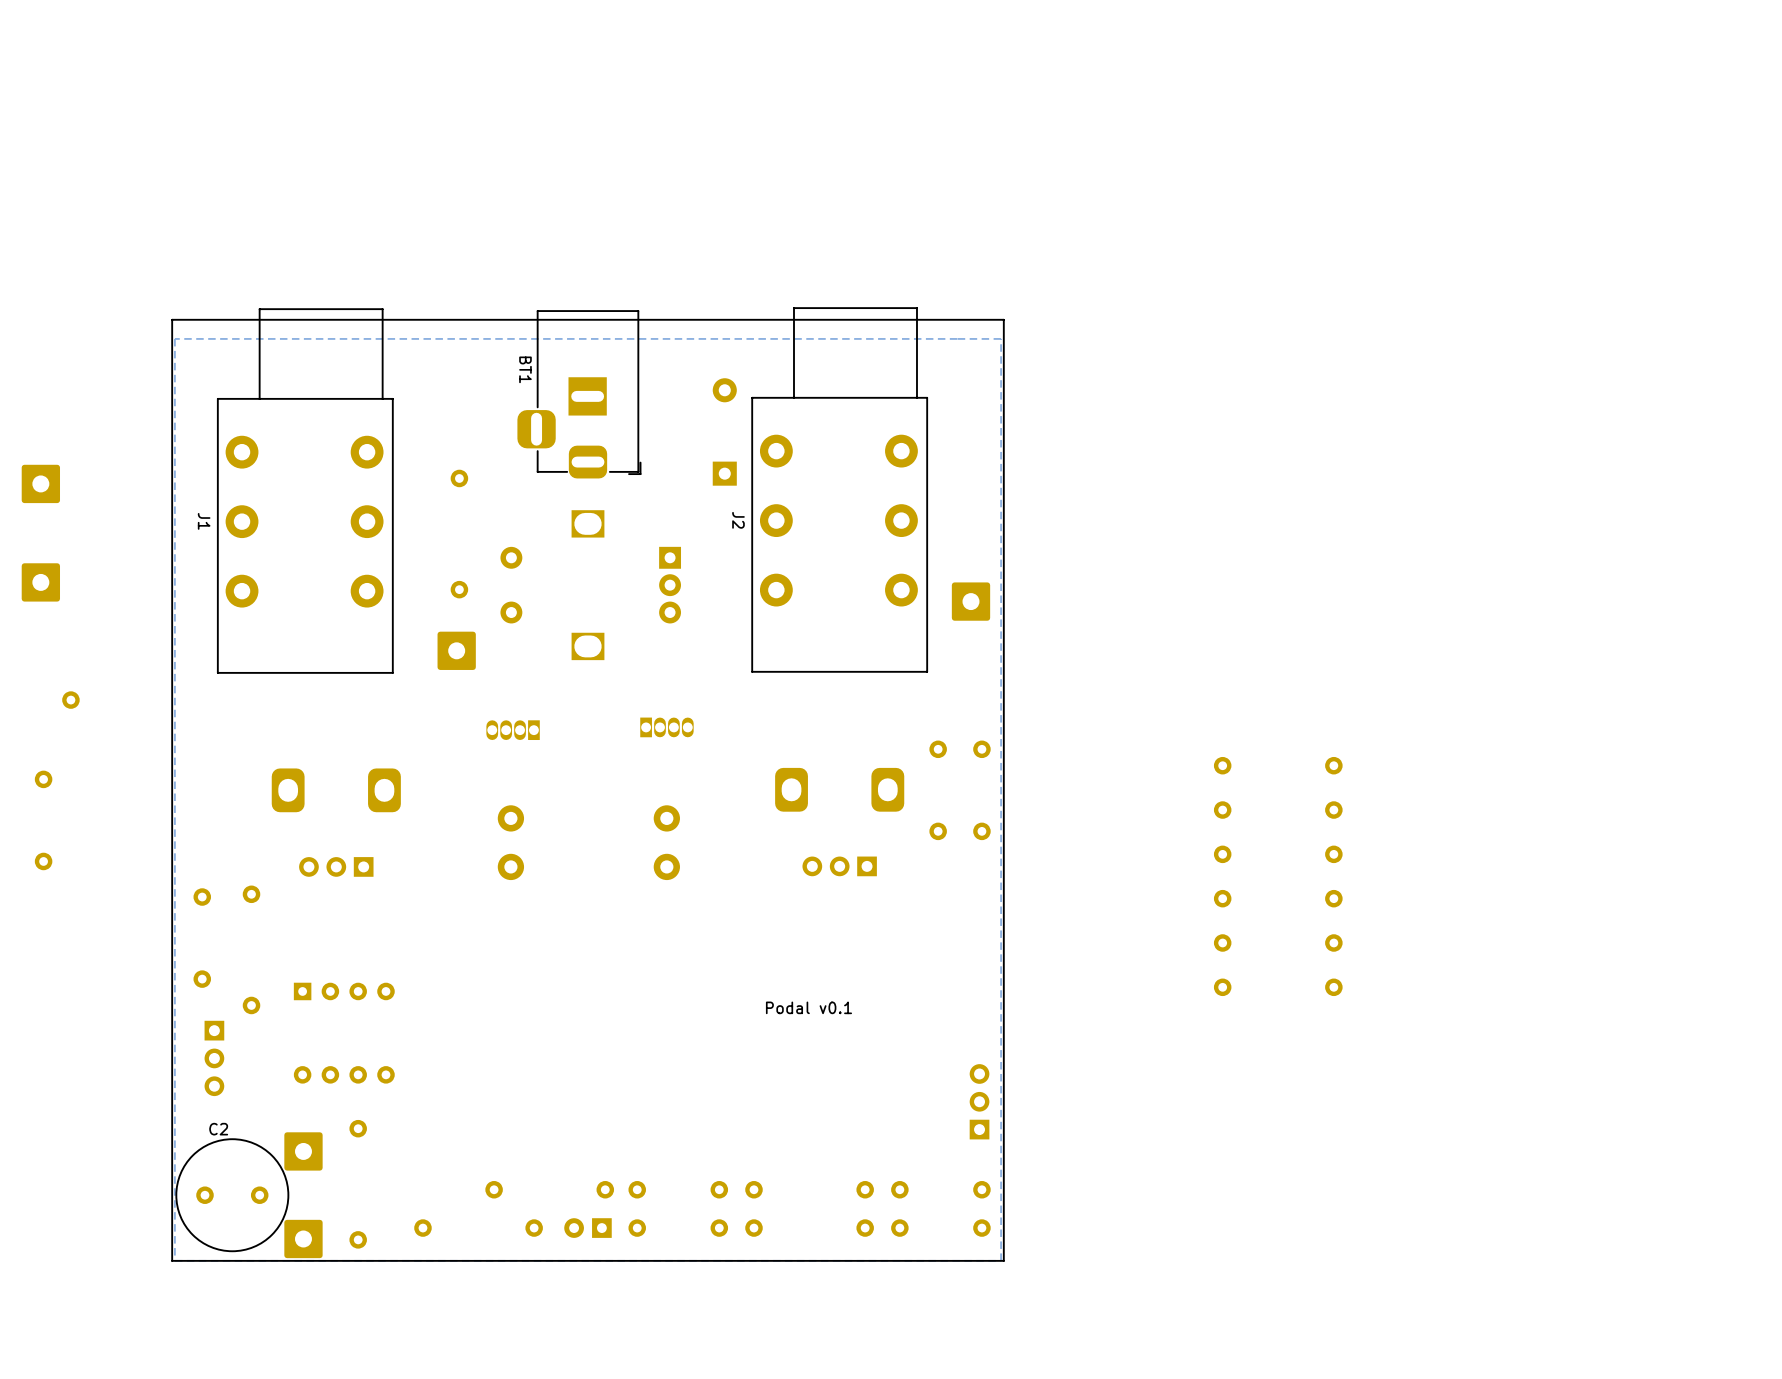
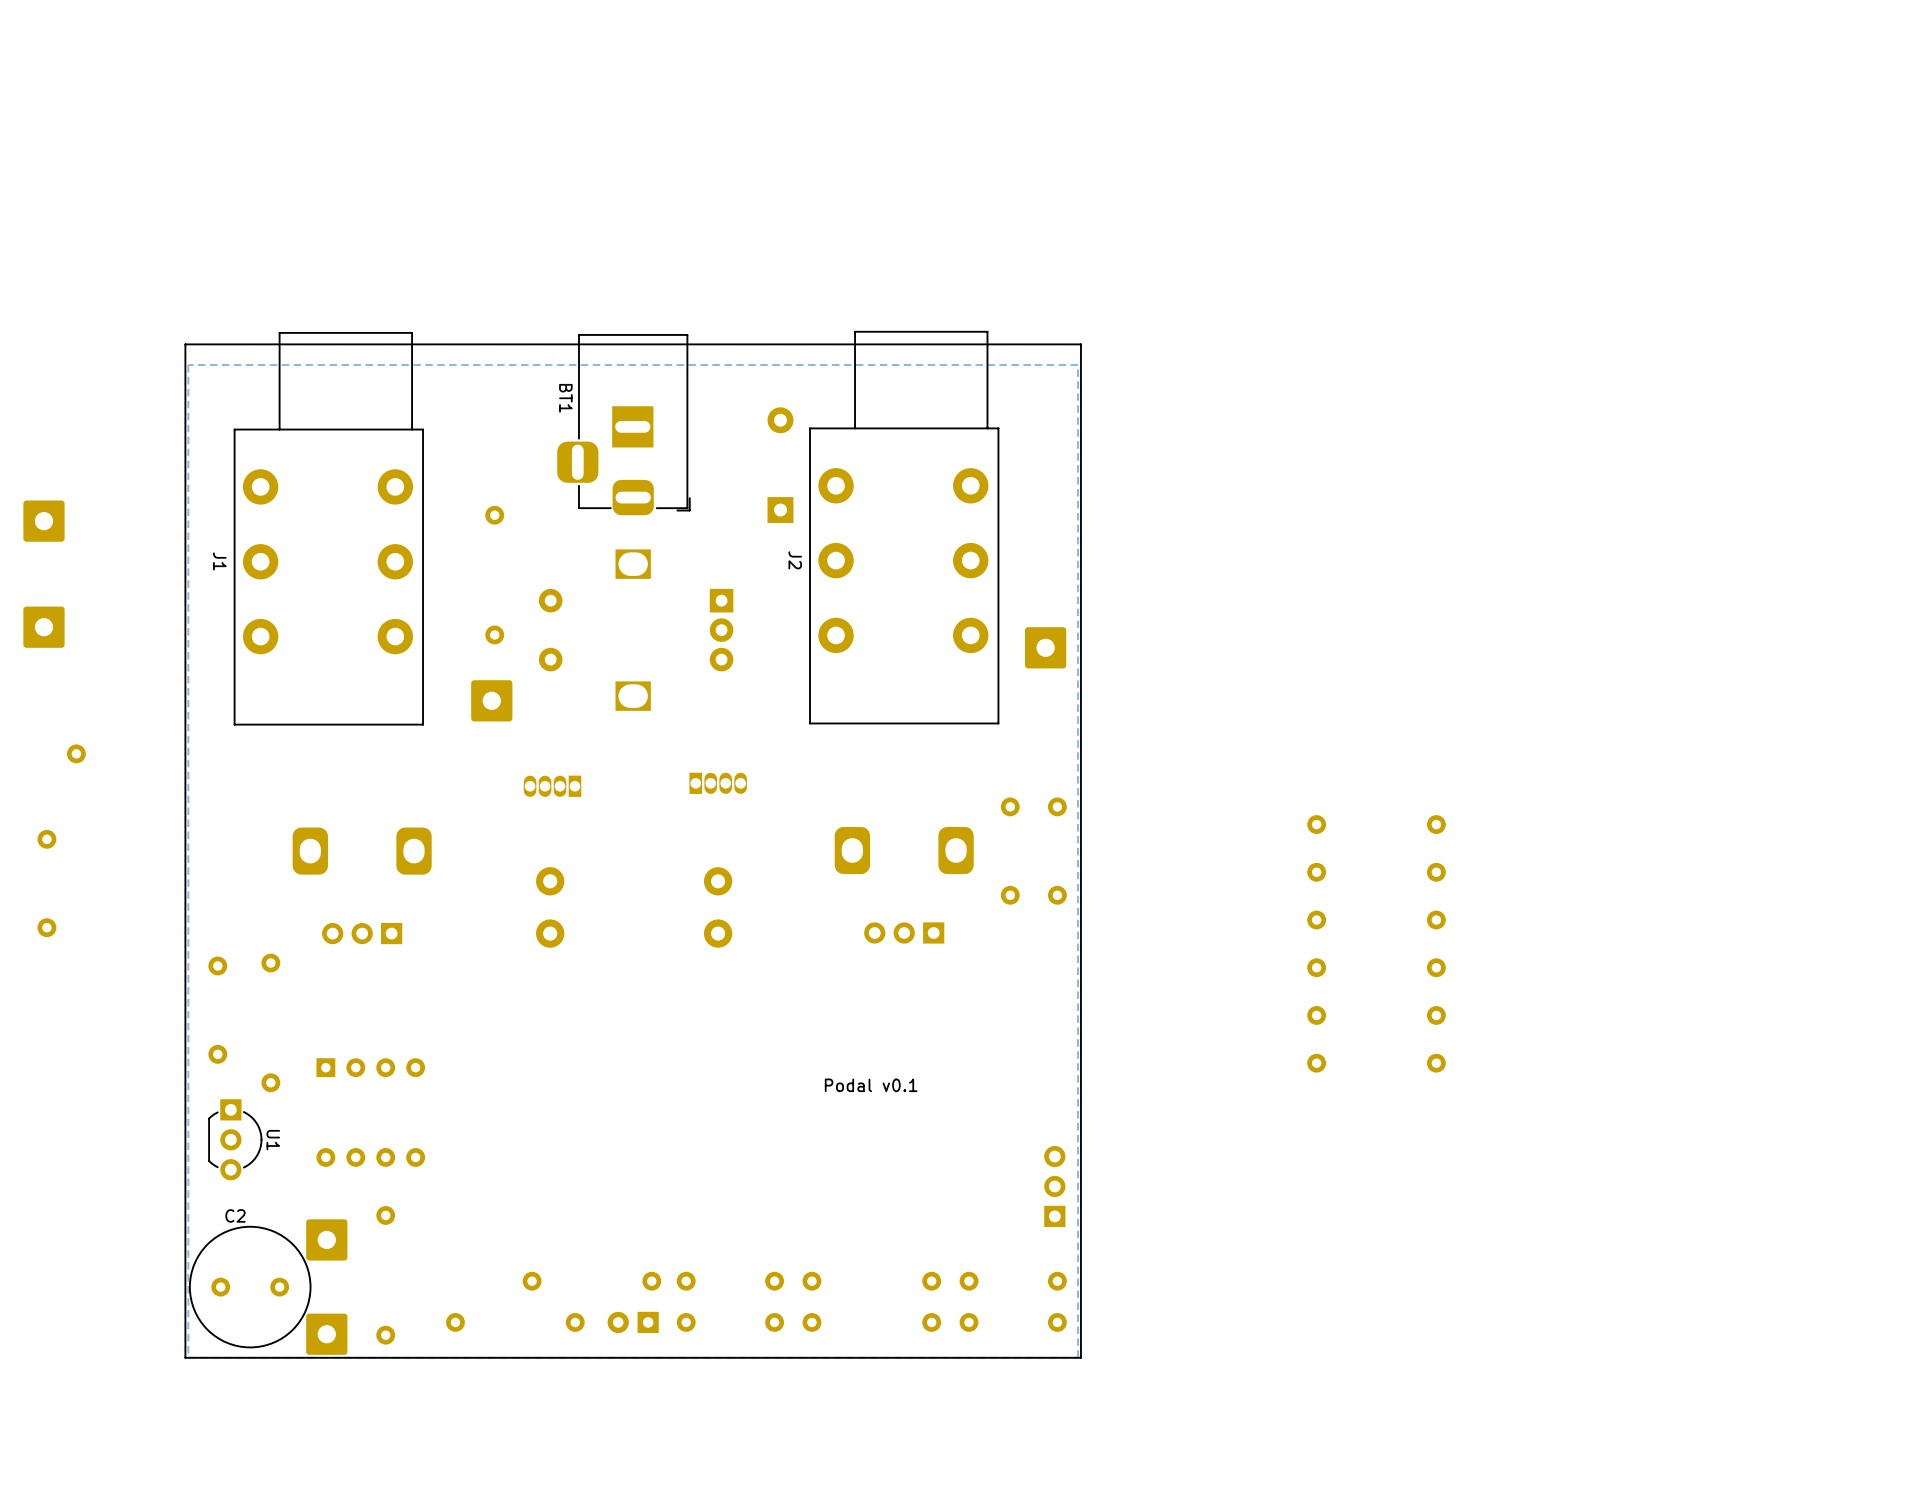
U1 side: top (214, 1058) -> bottom (235, 1139)

